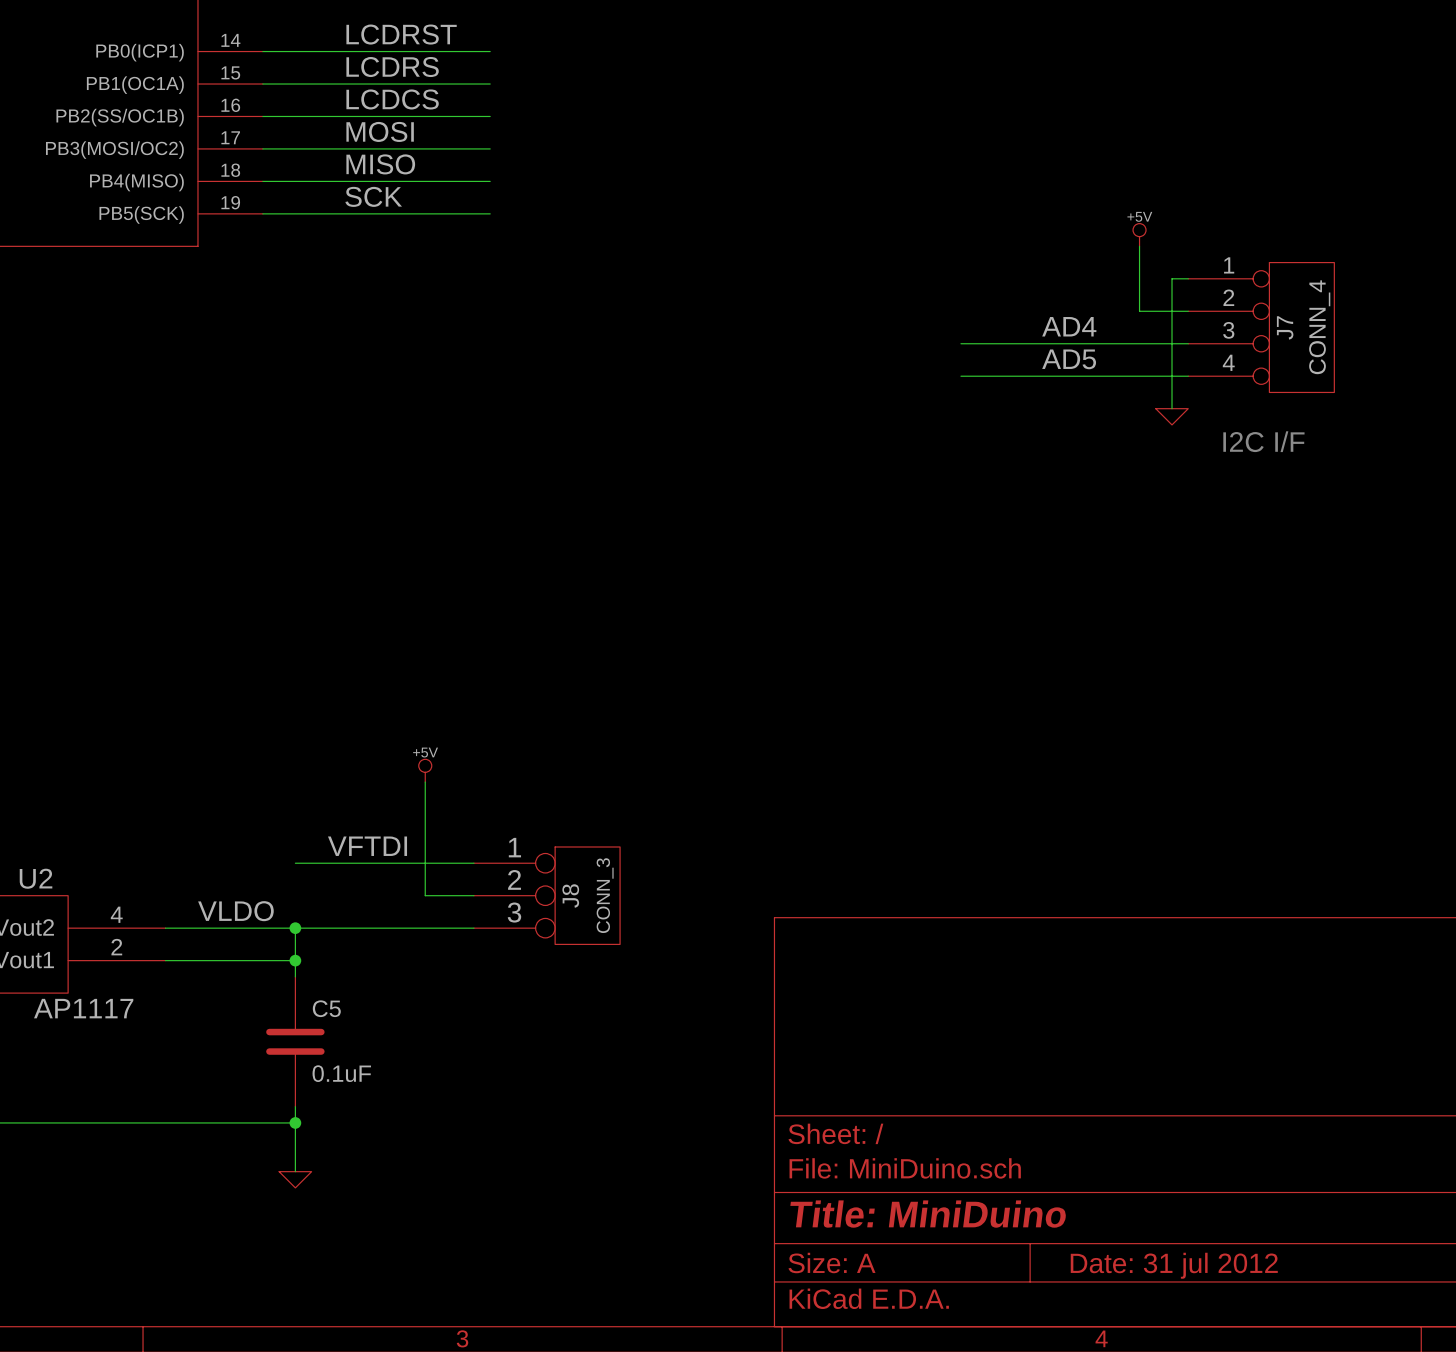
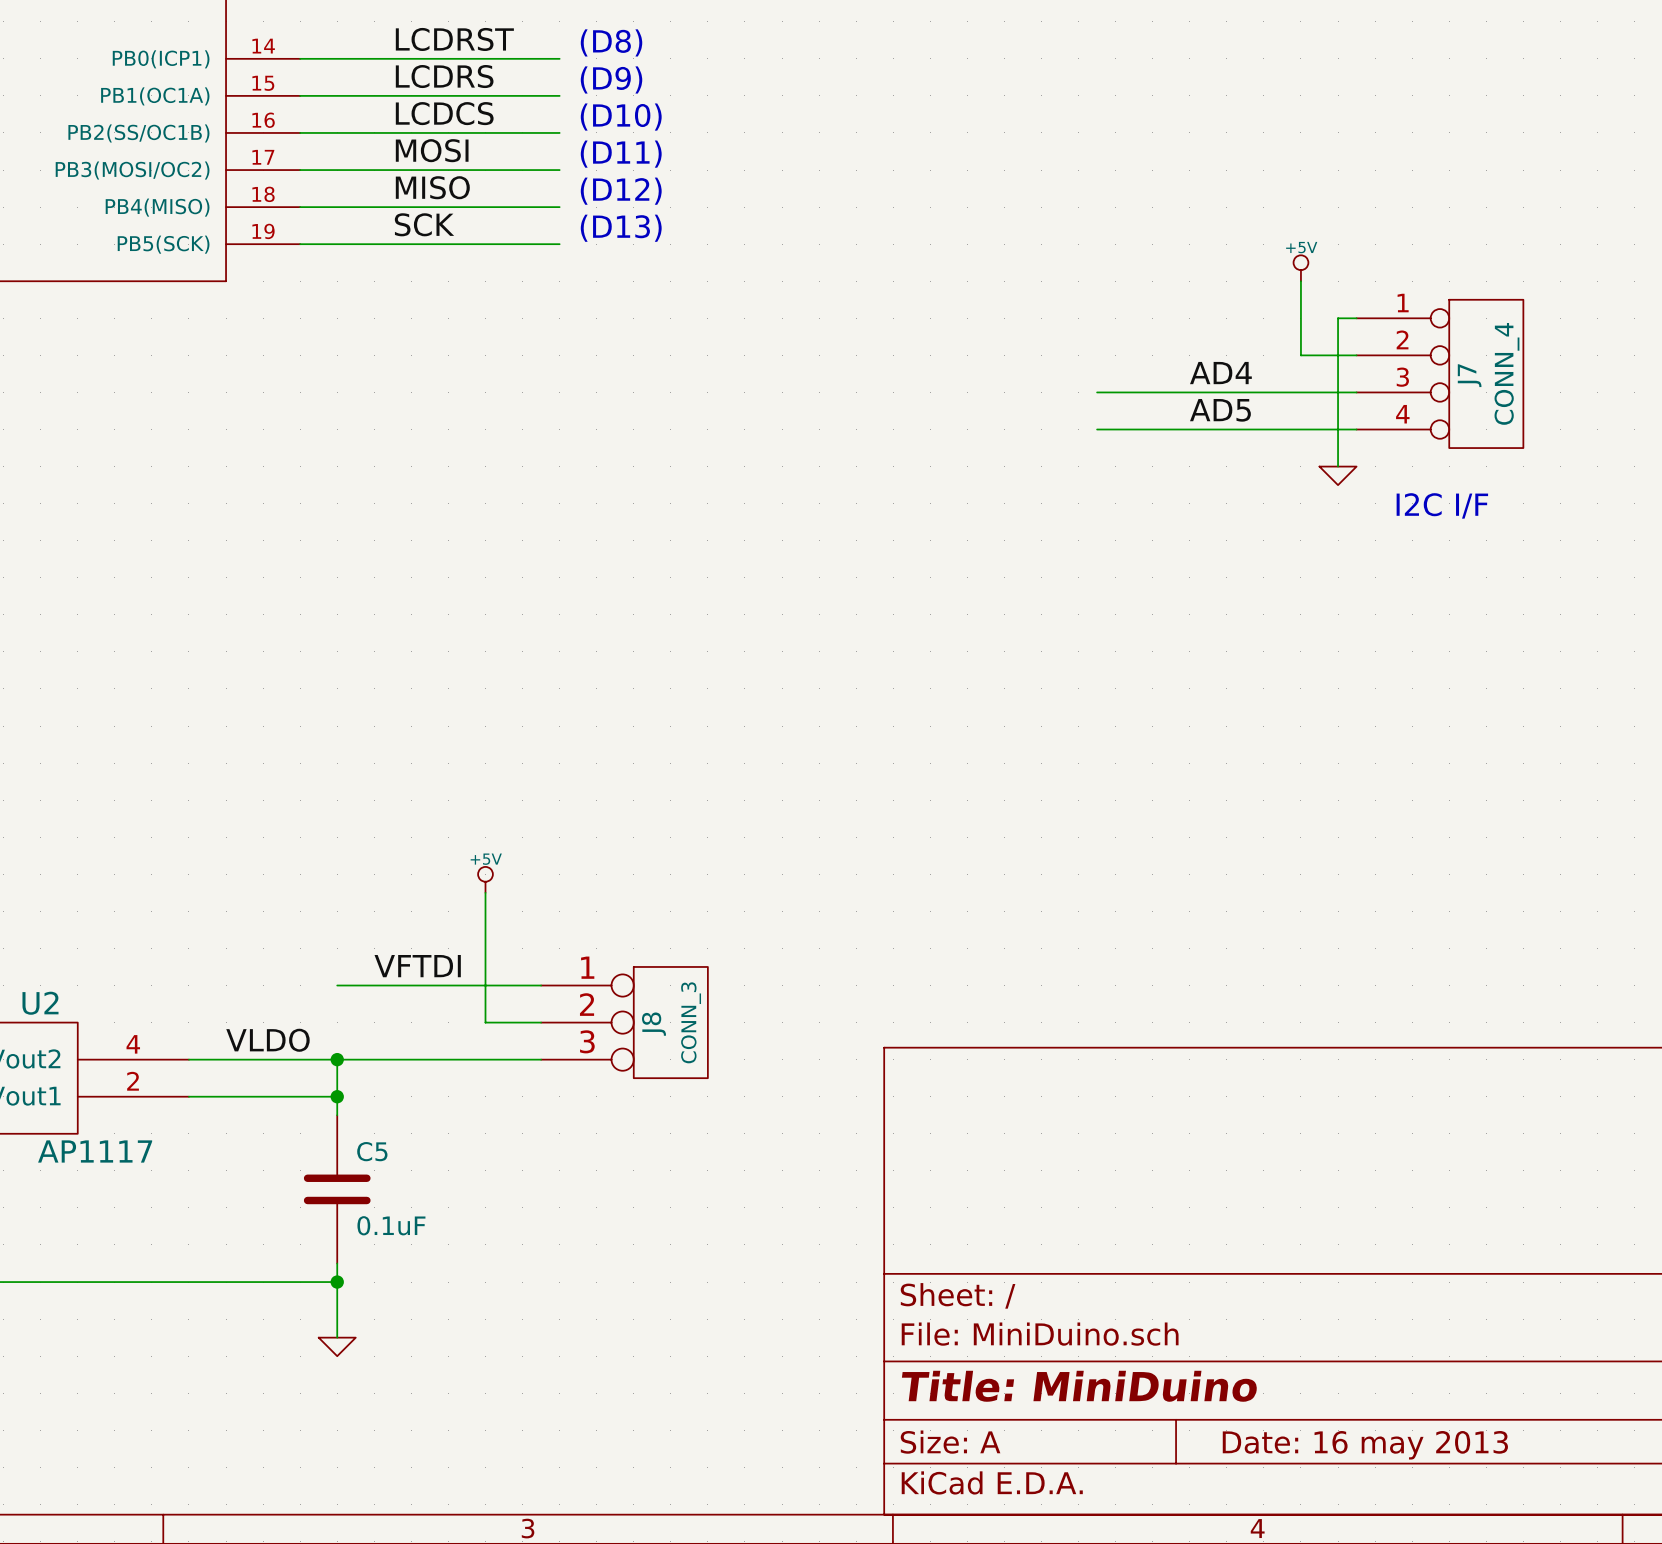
text: none -> (D8) (611, 42)
text: none -> (D9) (611, 79)
text: none -> (D10) (621, 117)
text: none -> (D11) (621, 154)
text: none -> (D12) (621, 191)
text: none -> (D13) (621, 228)
title block: Date: 31 jul 2012 (1174, 1265) -> Date: 16 may 2013 (1365, 1445)

